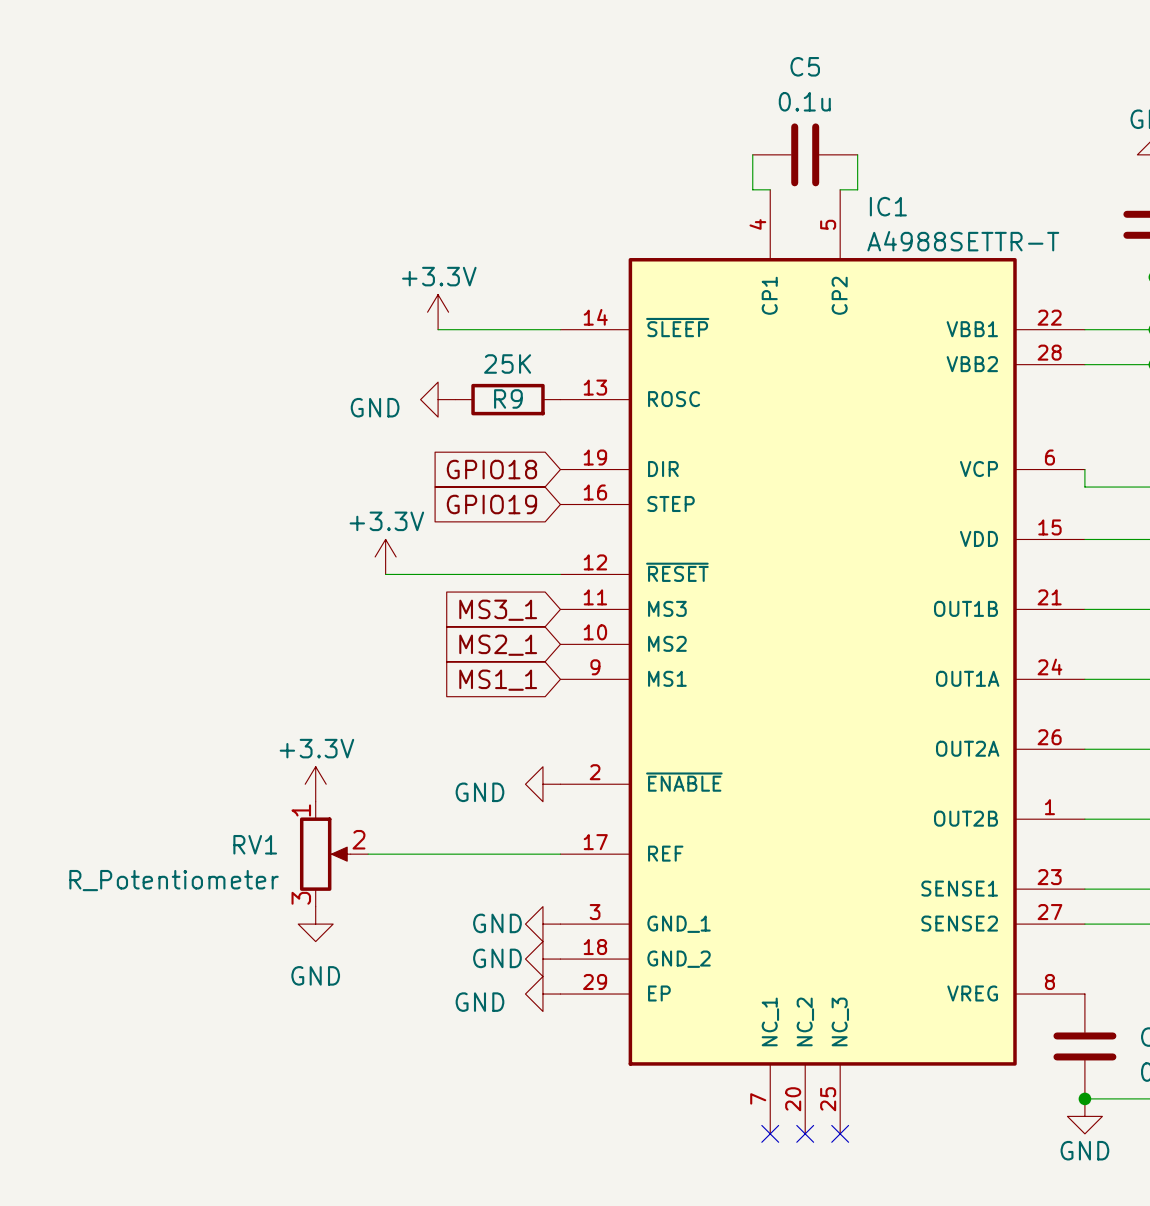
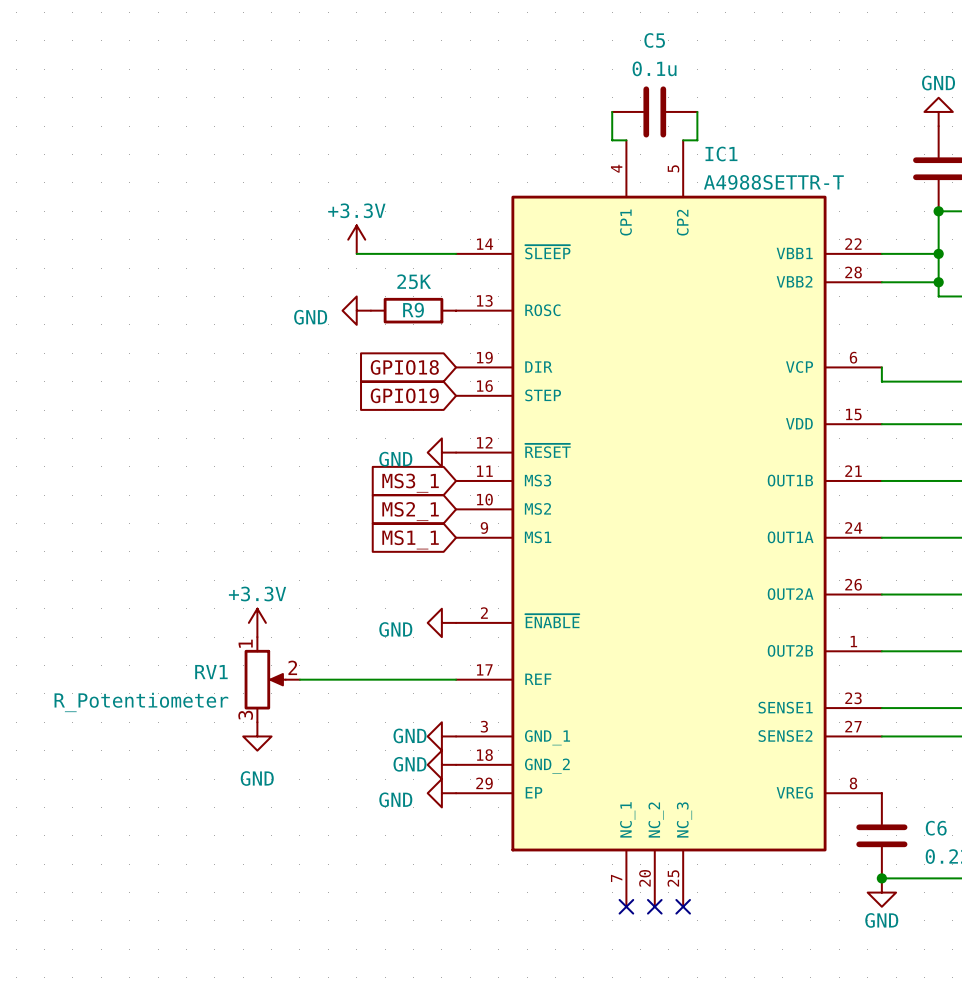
power symbol: +3.3V (385, 556) -> none
wire: (385, 574) (560, 574) -> none
power symbol: none -> GND (441, 452)

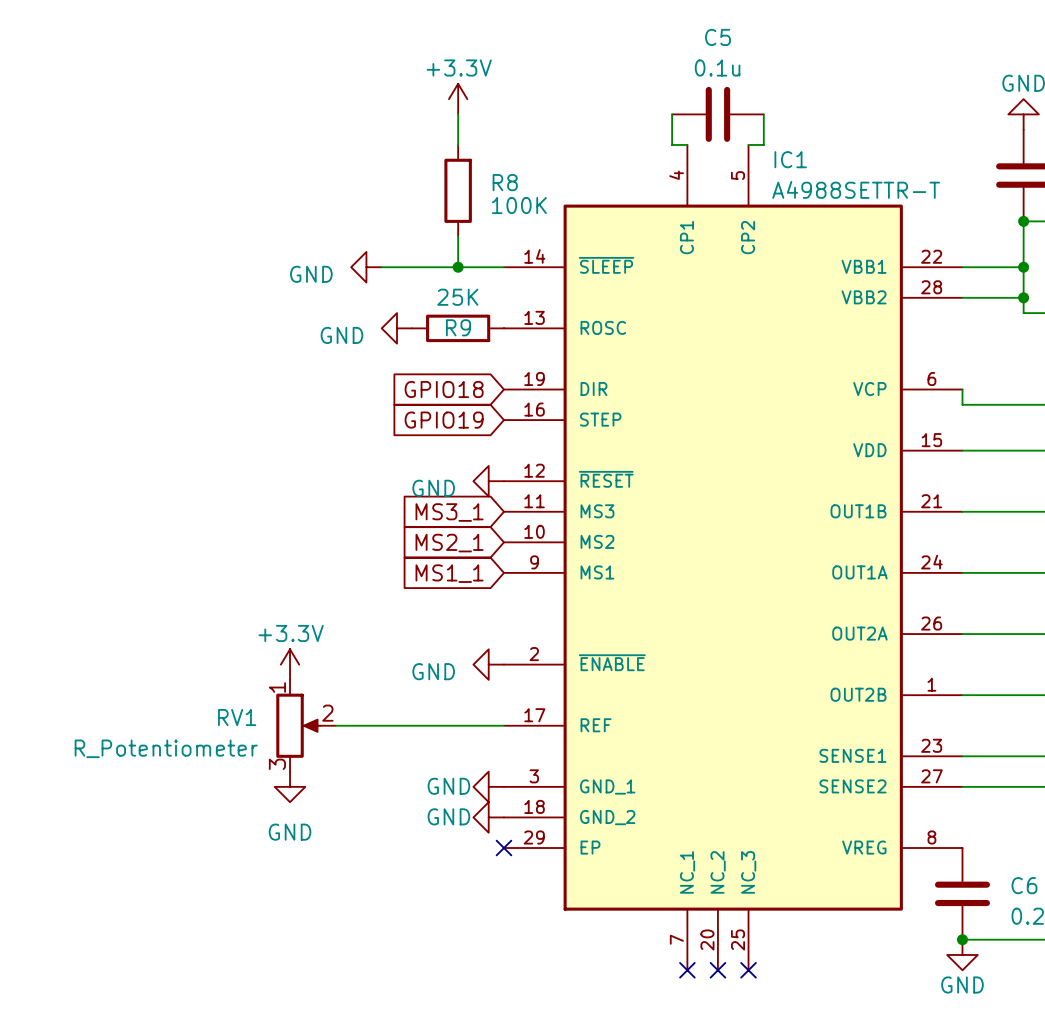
wire: none -> (458, 114) (458, 144)
R8: none -> 100K (458, 190)
wire: none -> (458, 236) (458, 267)
power symbol position: +3.3V (356, 239) -> +3.3V (458, 99)
power symbol: none -> GND (366, 267)
wire: none -> (381, 267) (397, 267)
junction: none -> (458, 267)
power symbol: GND (441, 793) -> none
no-connect mark: none -> (503, 848)

